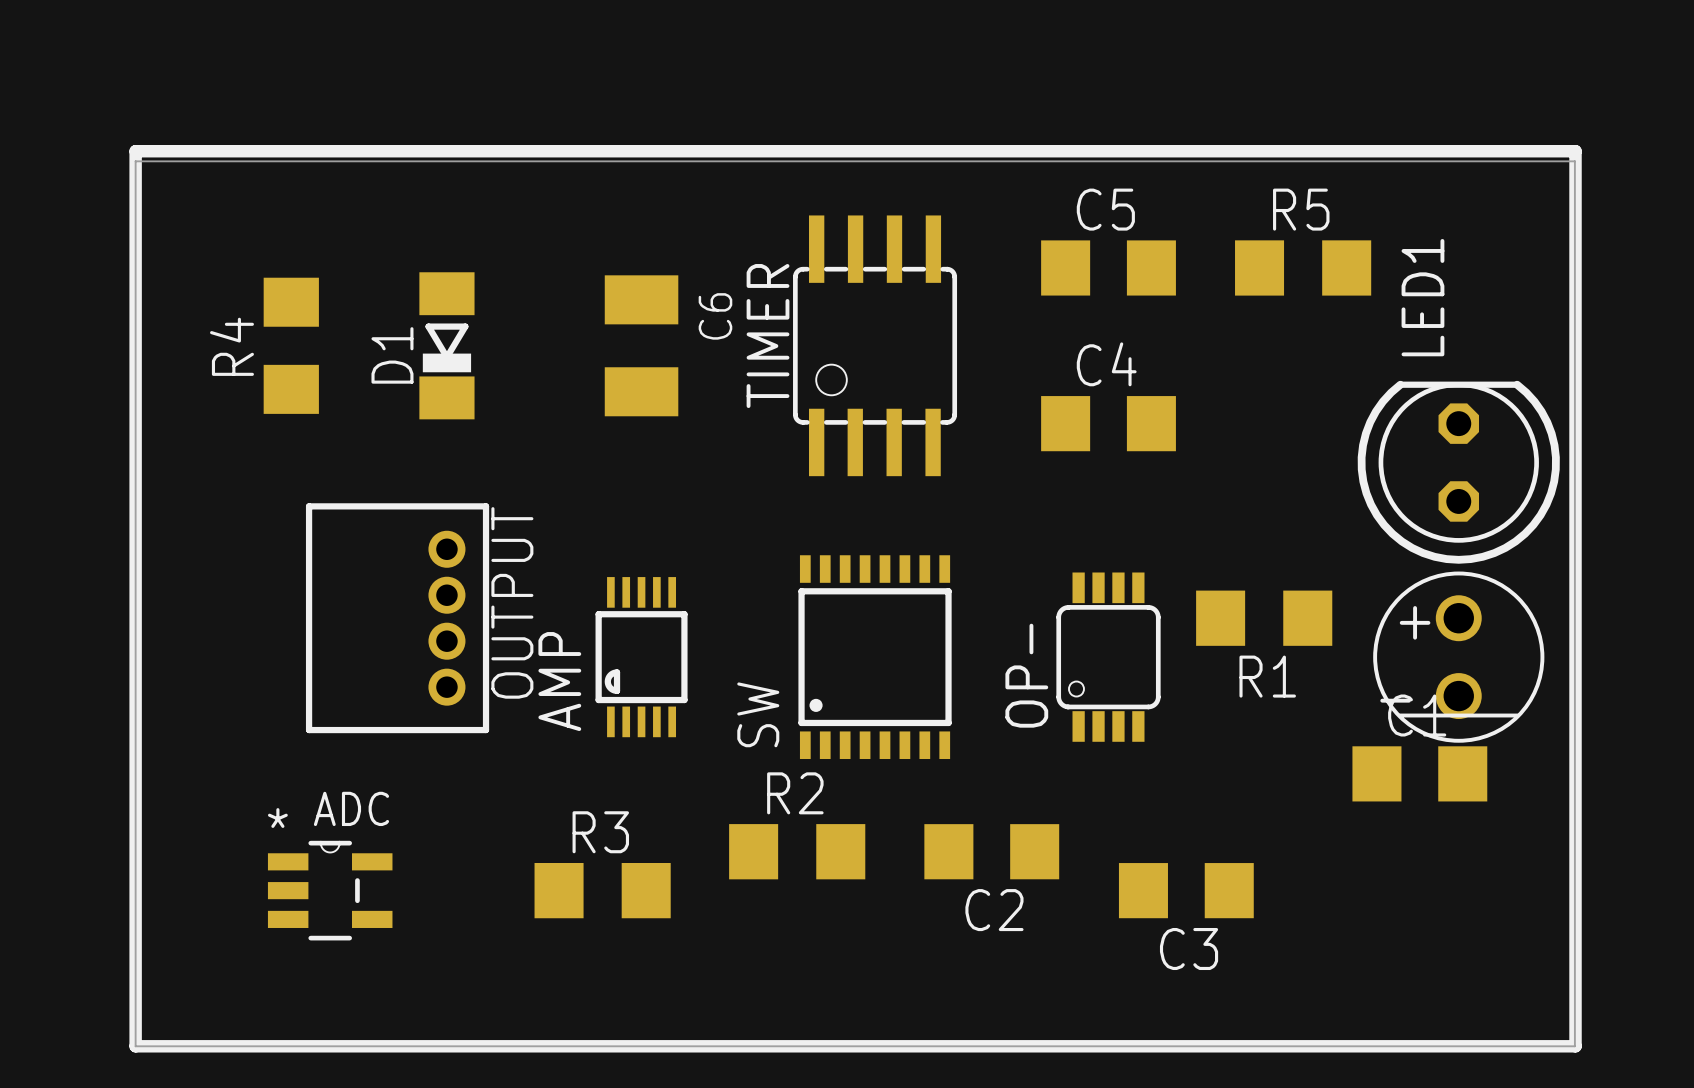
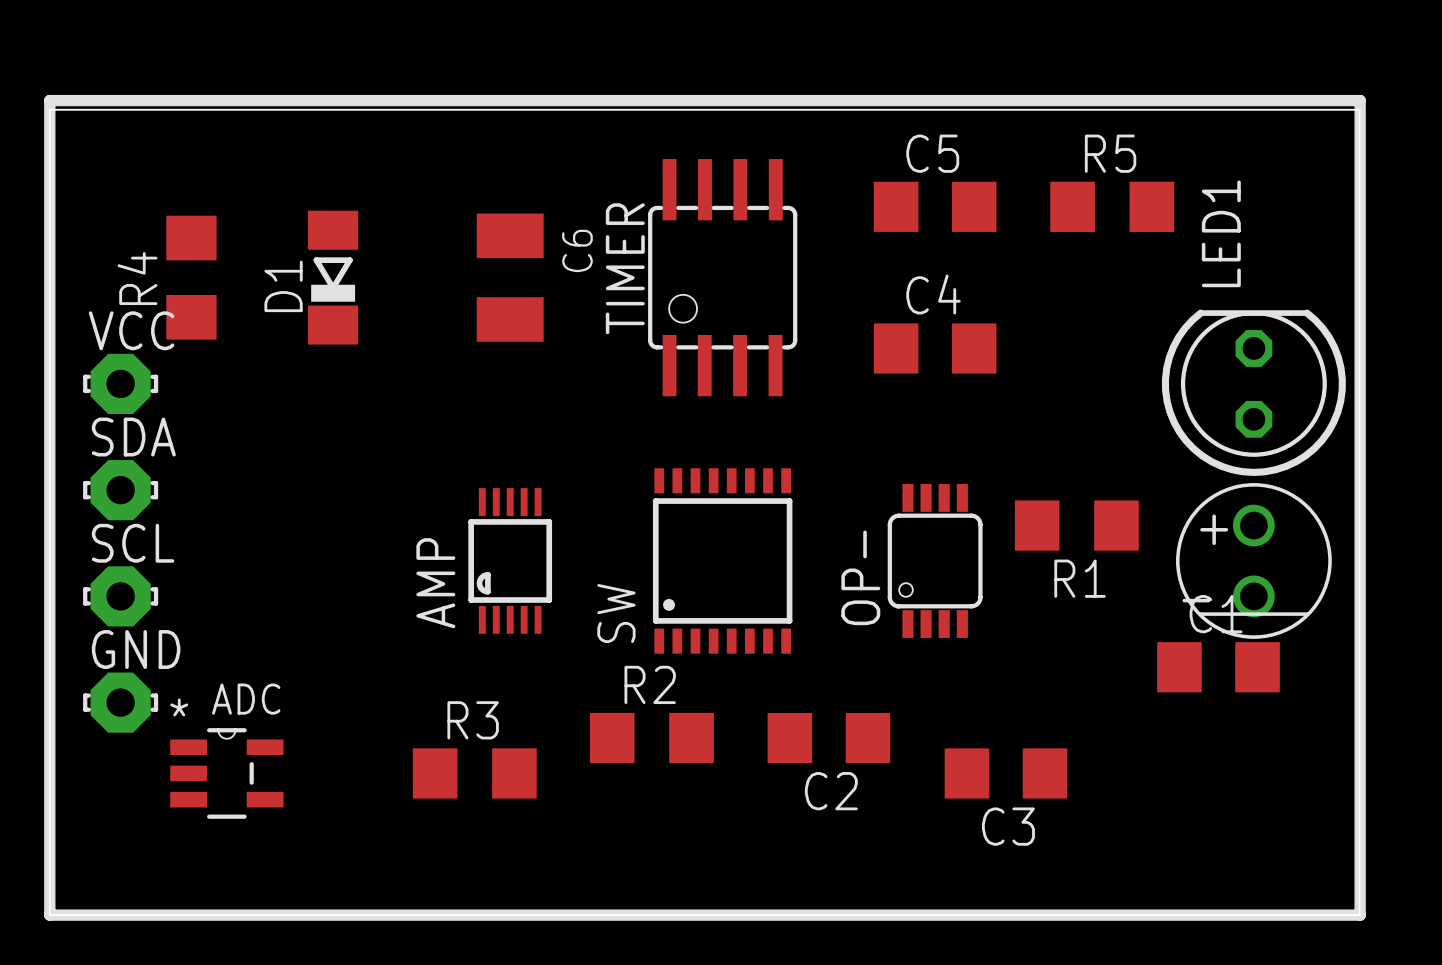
VCC: none -> (120, 383)
SDA: none -> (120, 490)
OUTPUT: (397, 618) -> none
SCL: none -> (120, 596)
GND: none -> (120, 702)

